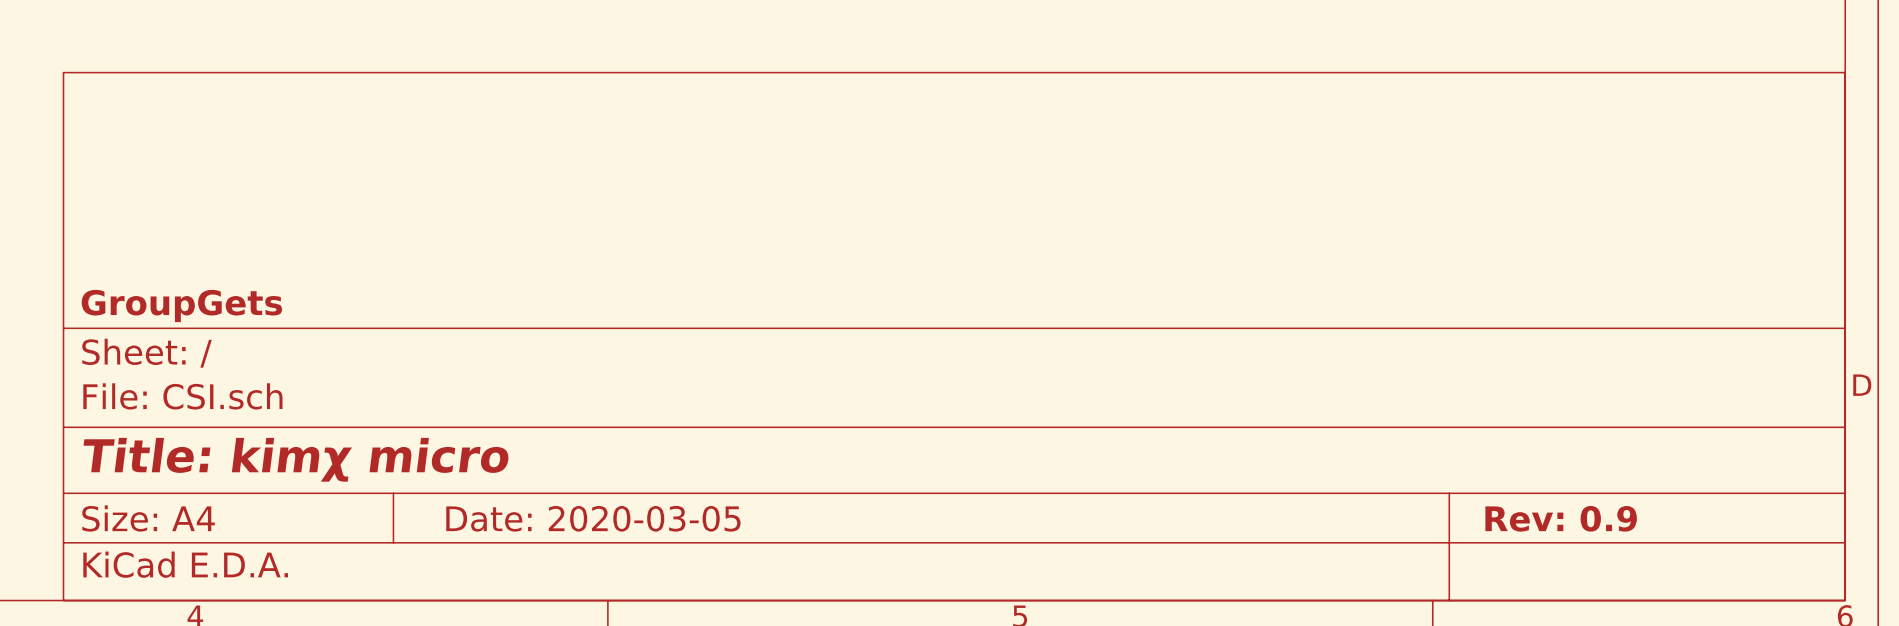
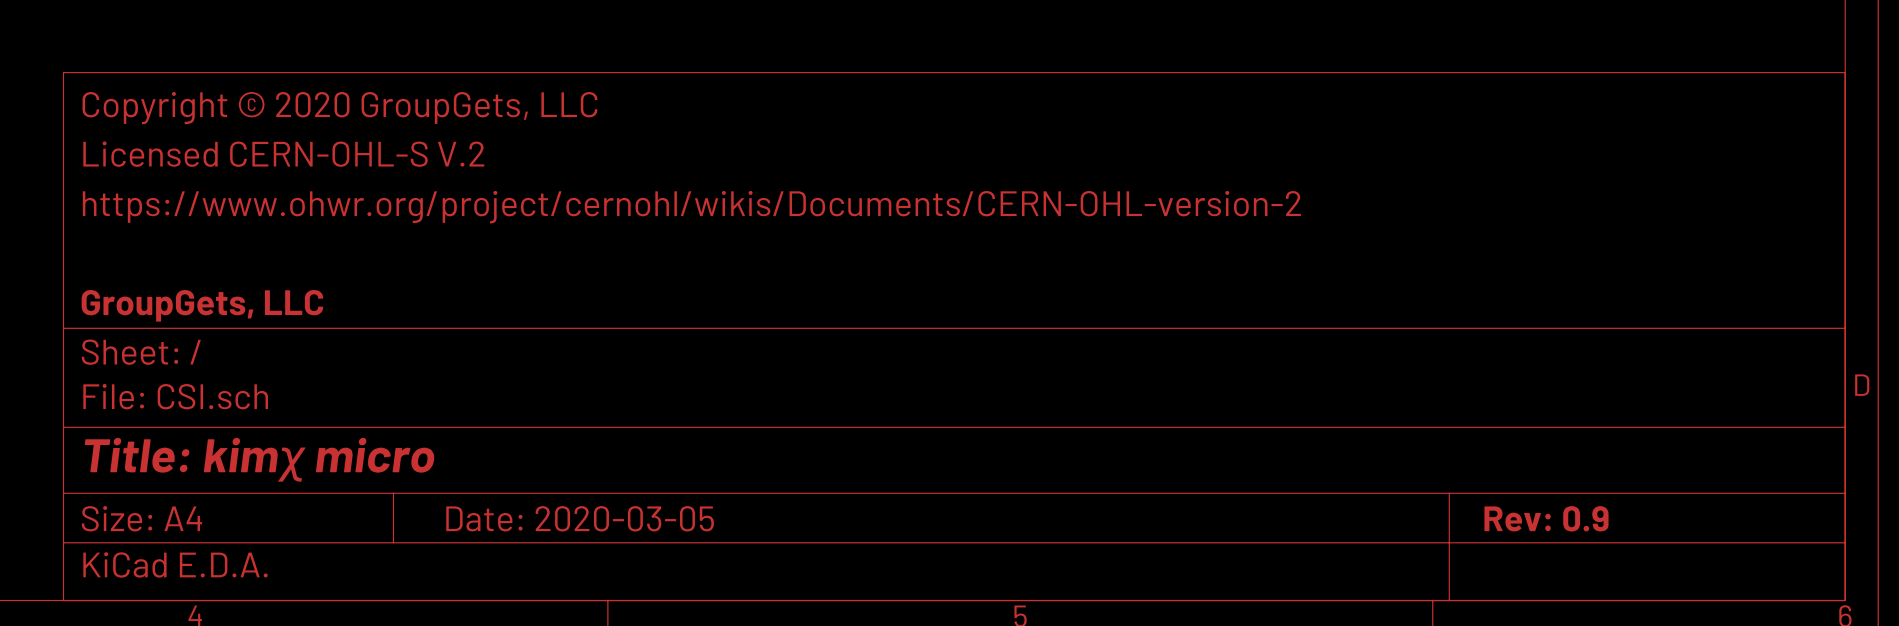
title block: none -> Copyright © 2020 GroupGets, LLC (339, 108)
title block: none -> Licensed CERN-OHL-S V.2 (283, 154)
title block: none -> https://www.ohwr.org/project/cernohl/wikis/Documents/CERN-OHL-version-2 (691, 207)
title block: GroupGets (181, 305) -> GroupGets, LLC (202, 305)

